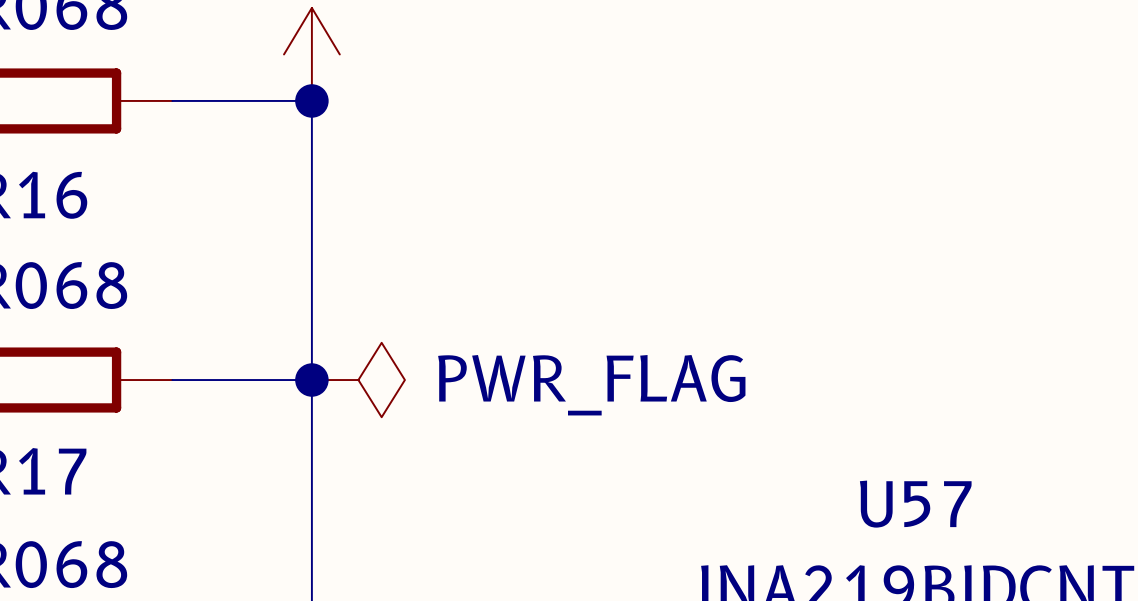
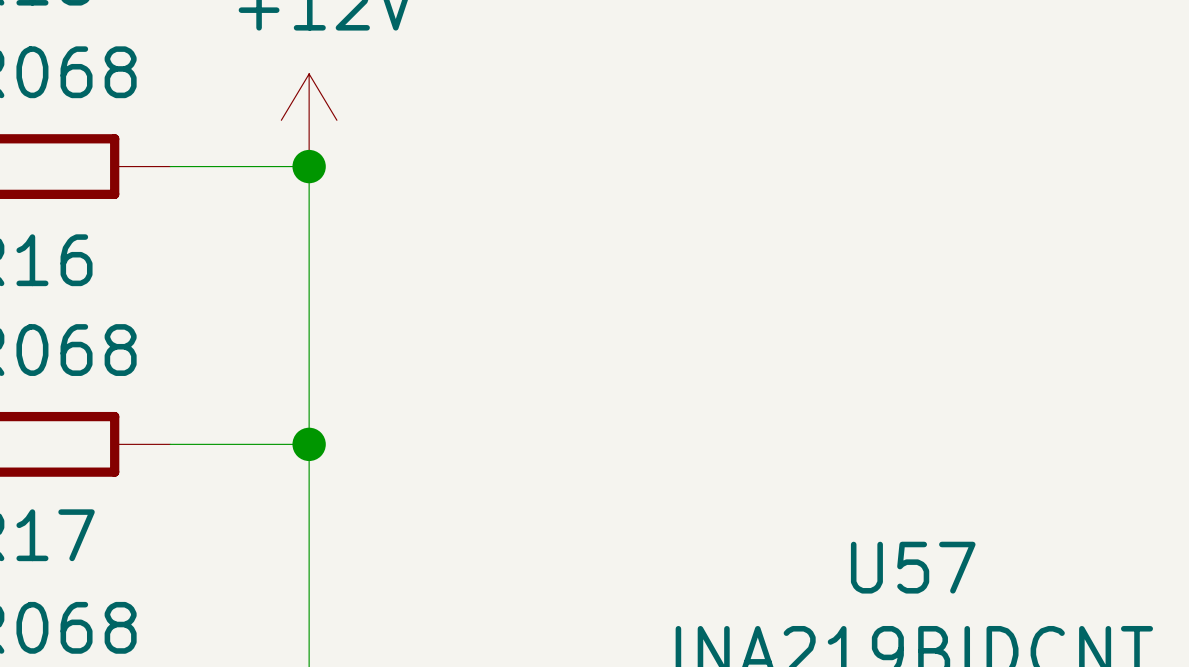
power symbol: PWR_FLAG (358, 380) -> none

